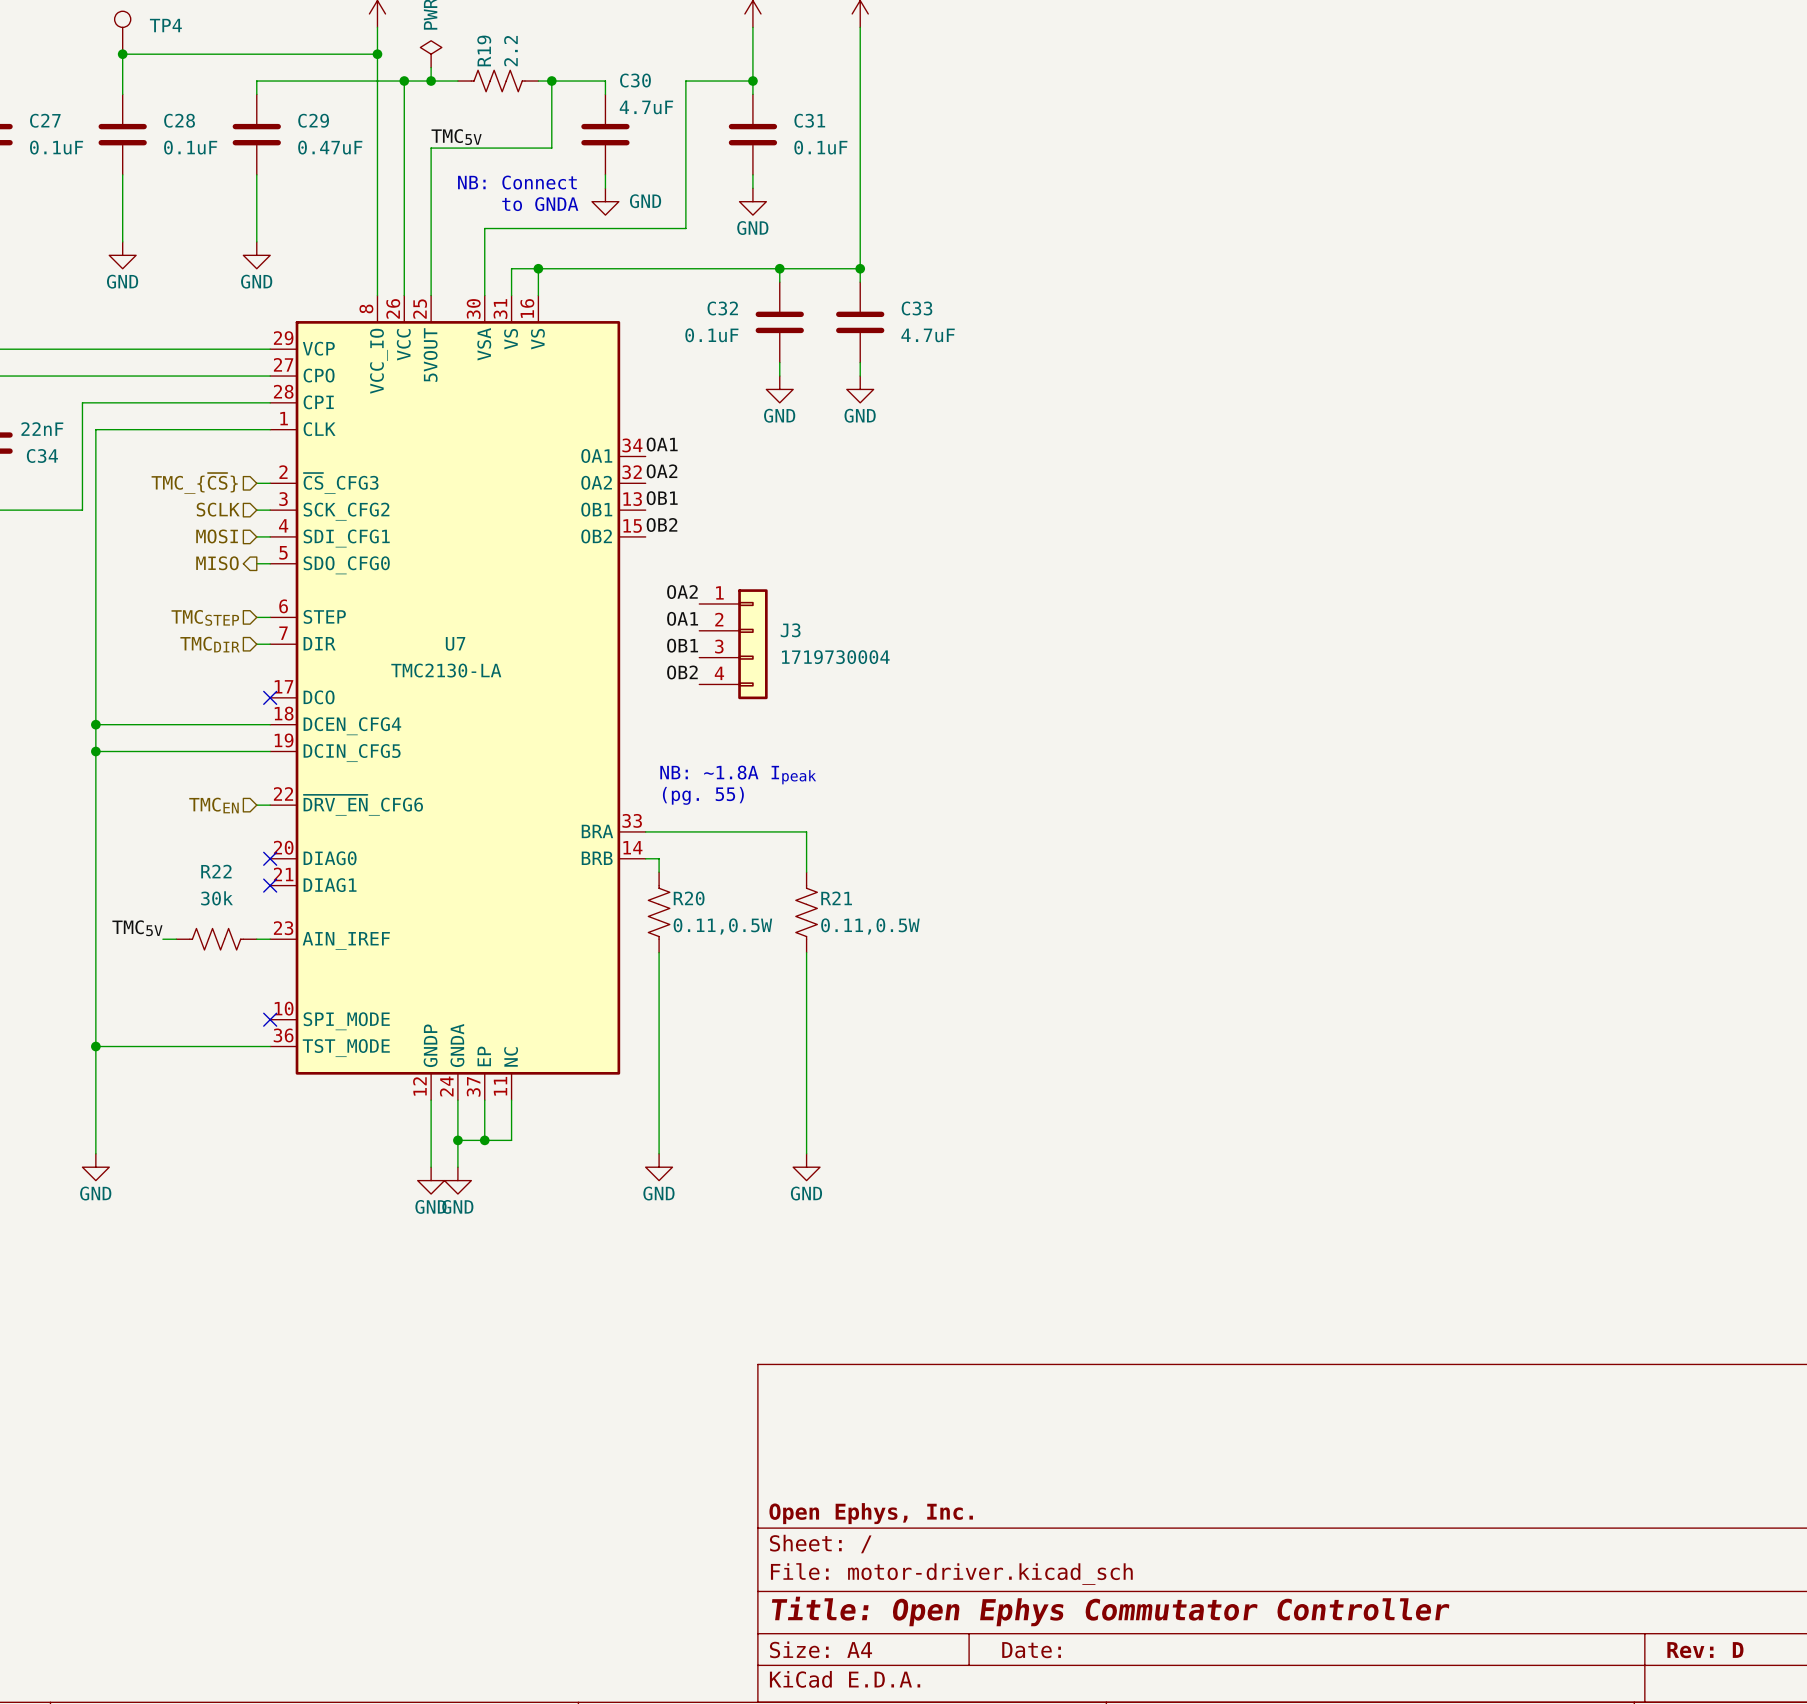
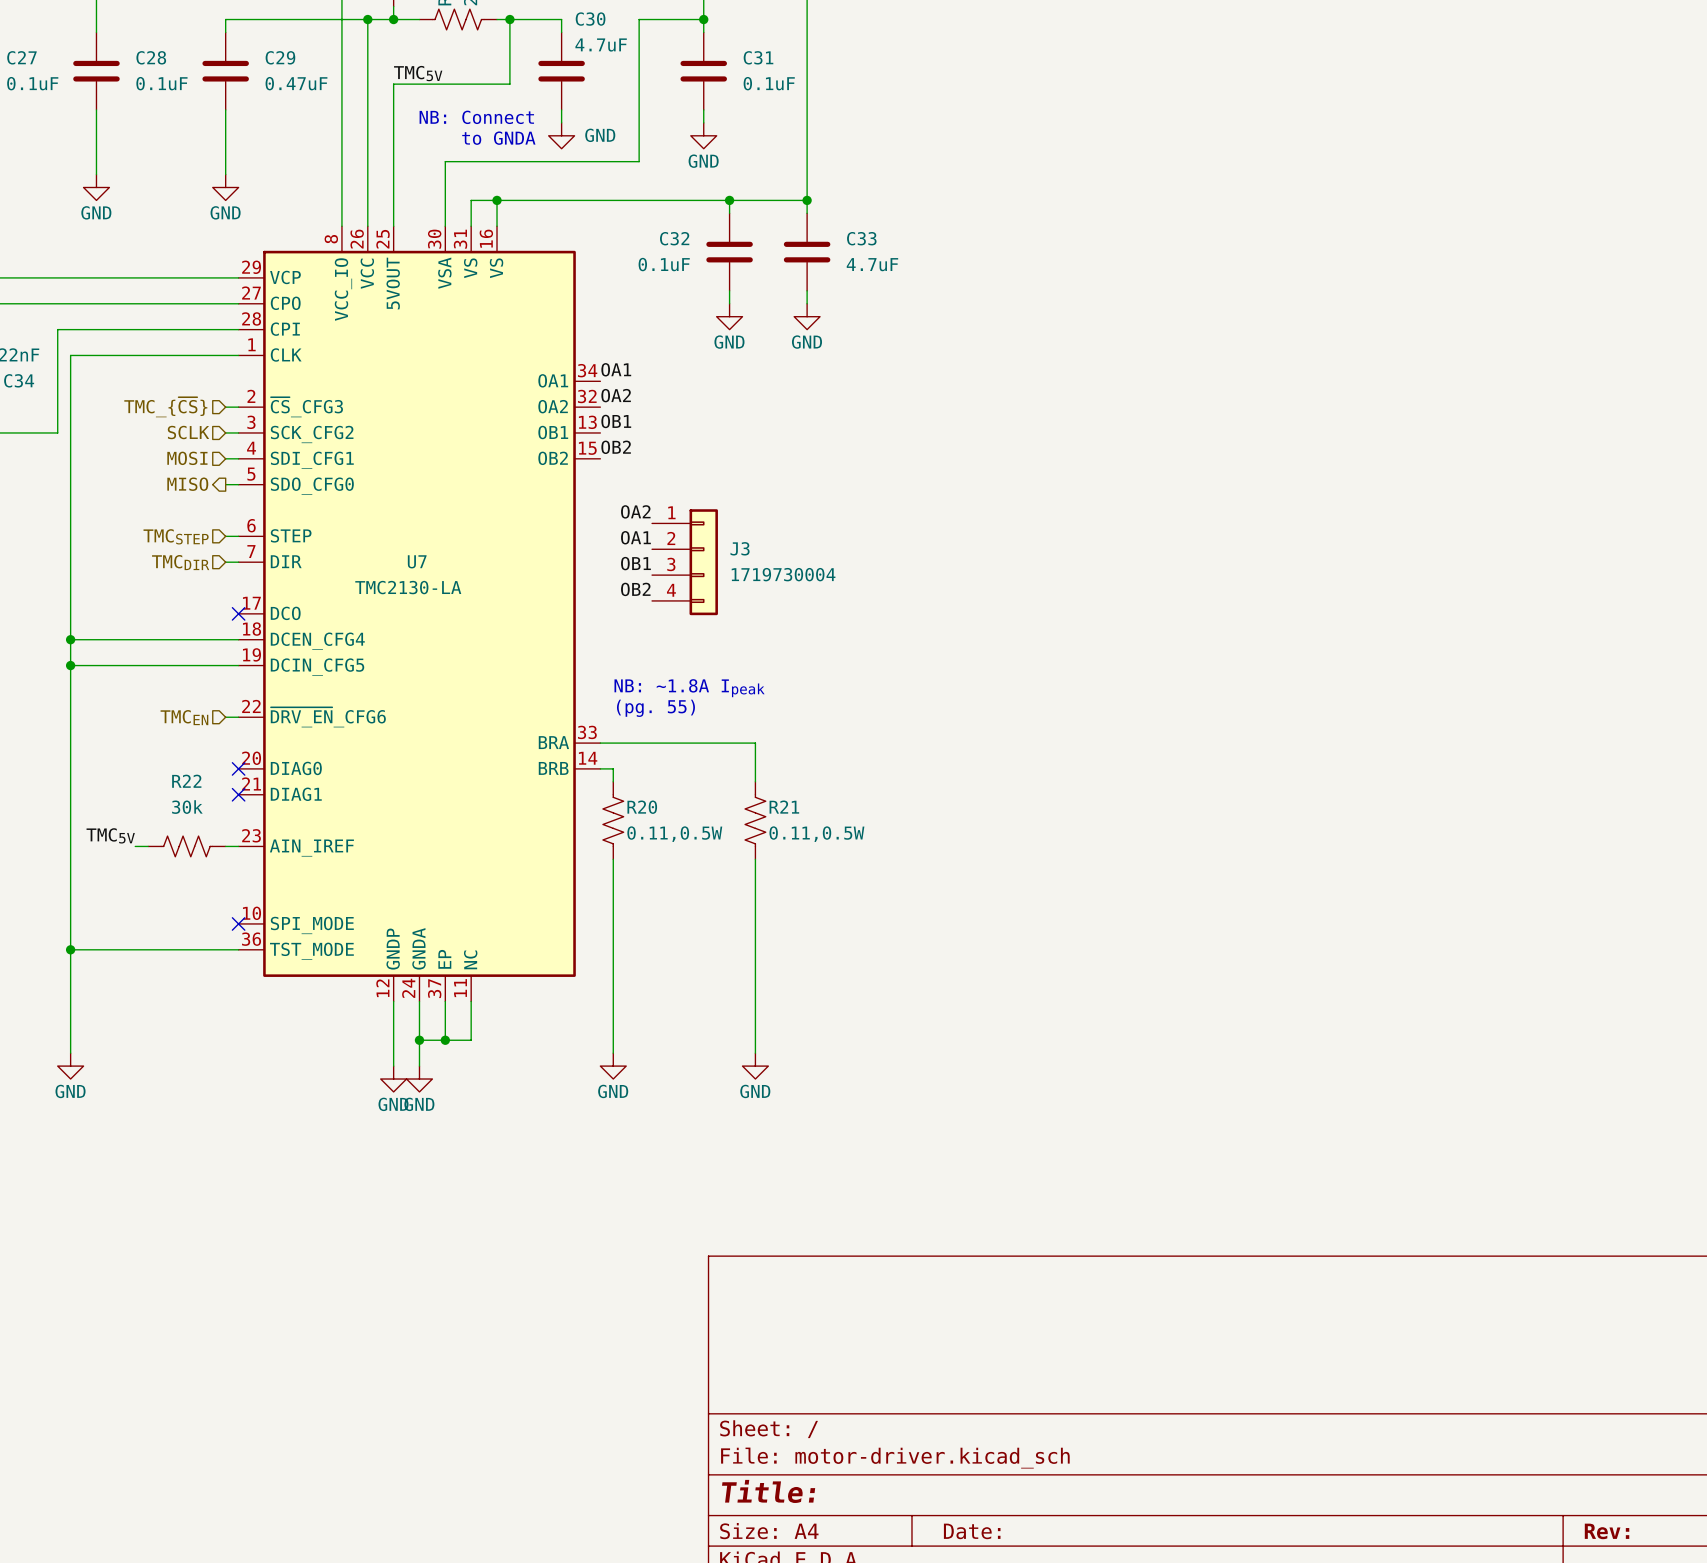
title block: Open Ephys, Inc. (871, 1513) -> none
title block: Title: Open Ephys Commutator Controller (1110, 1611) -> Title: (768, 1491)
title block: Rev: D (1705, 1650) -> Rev: (1607, 1531)

